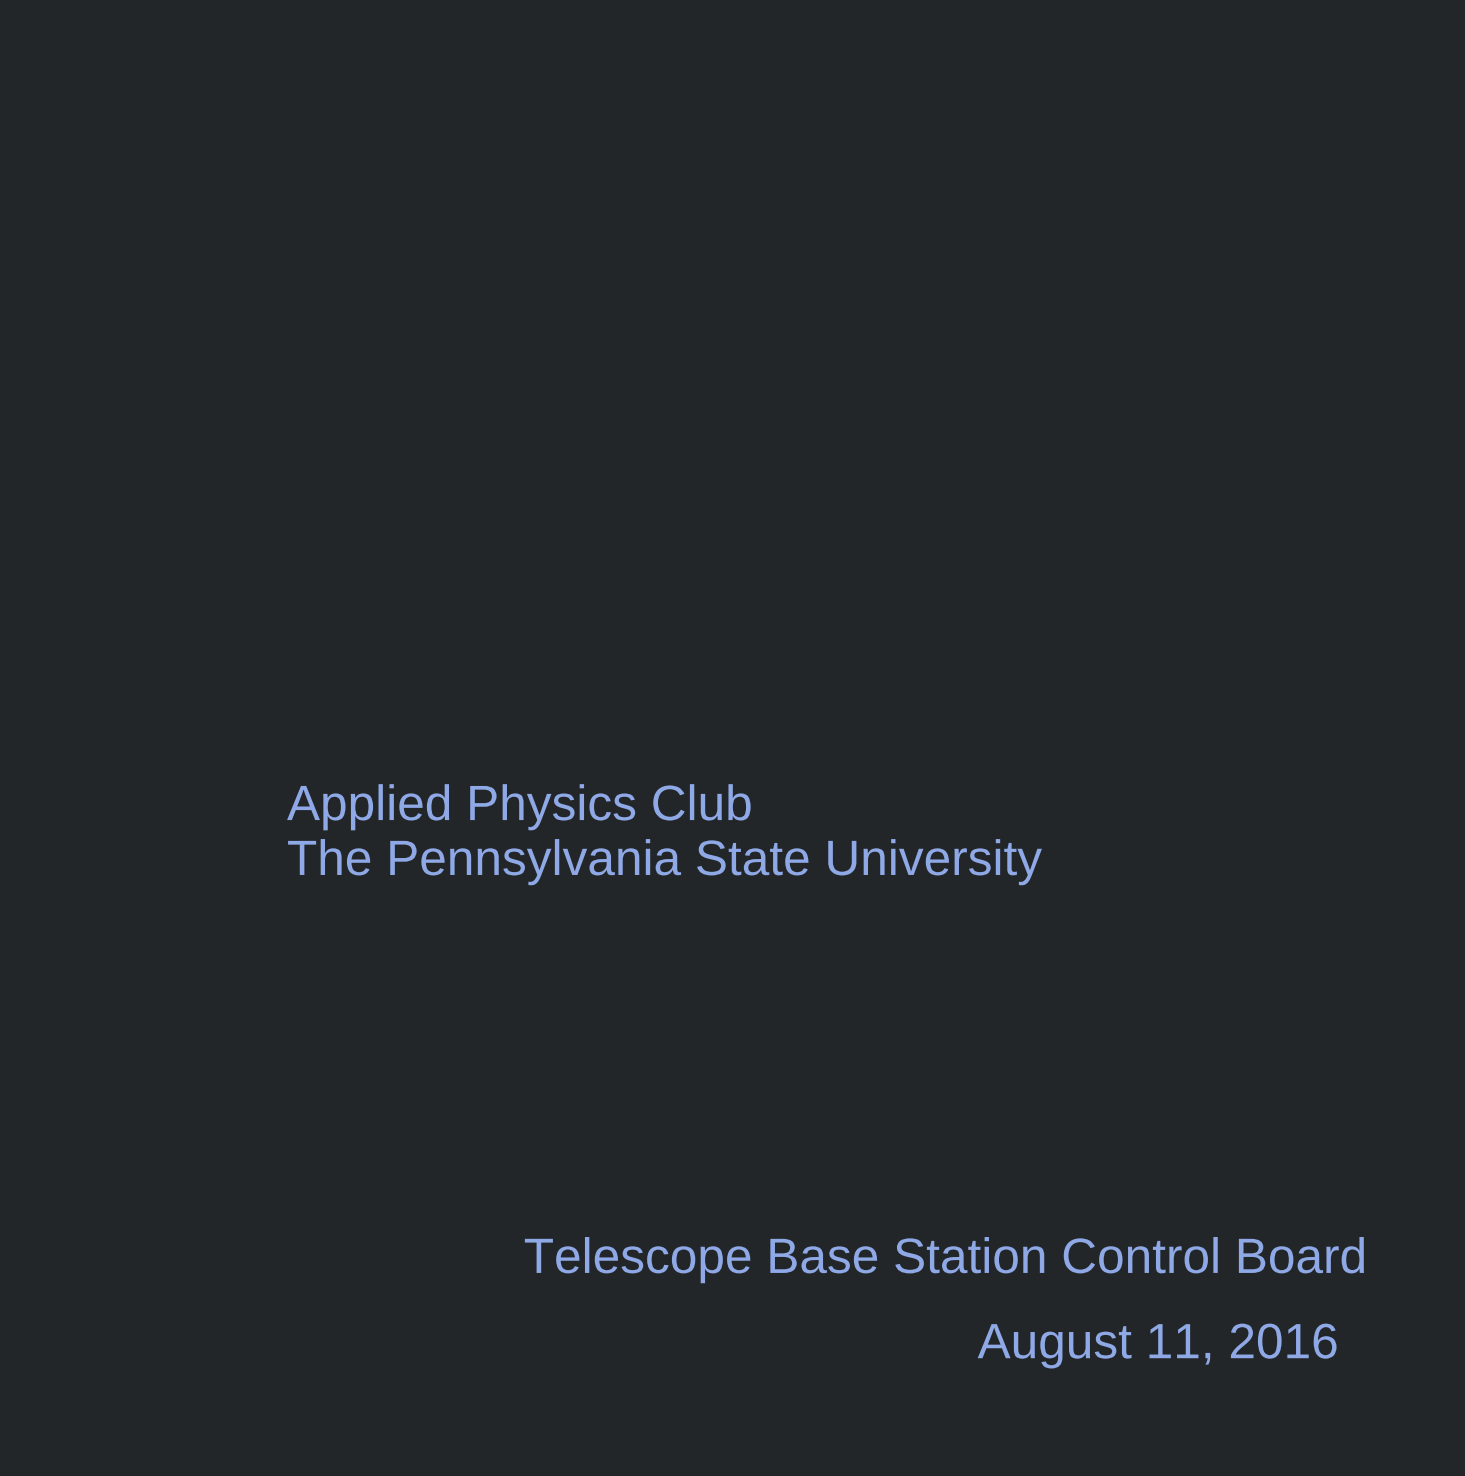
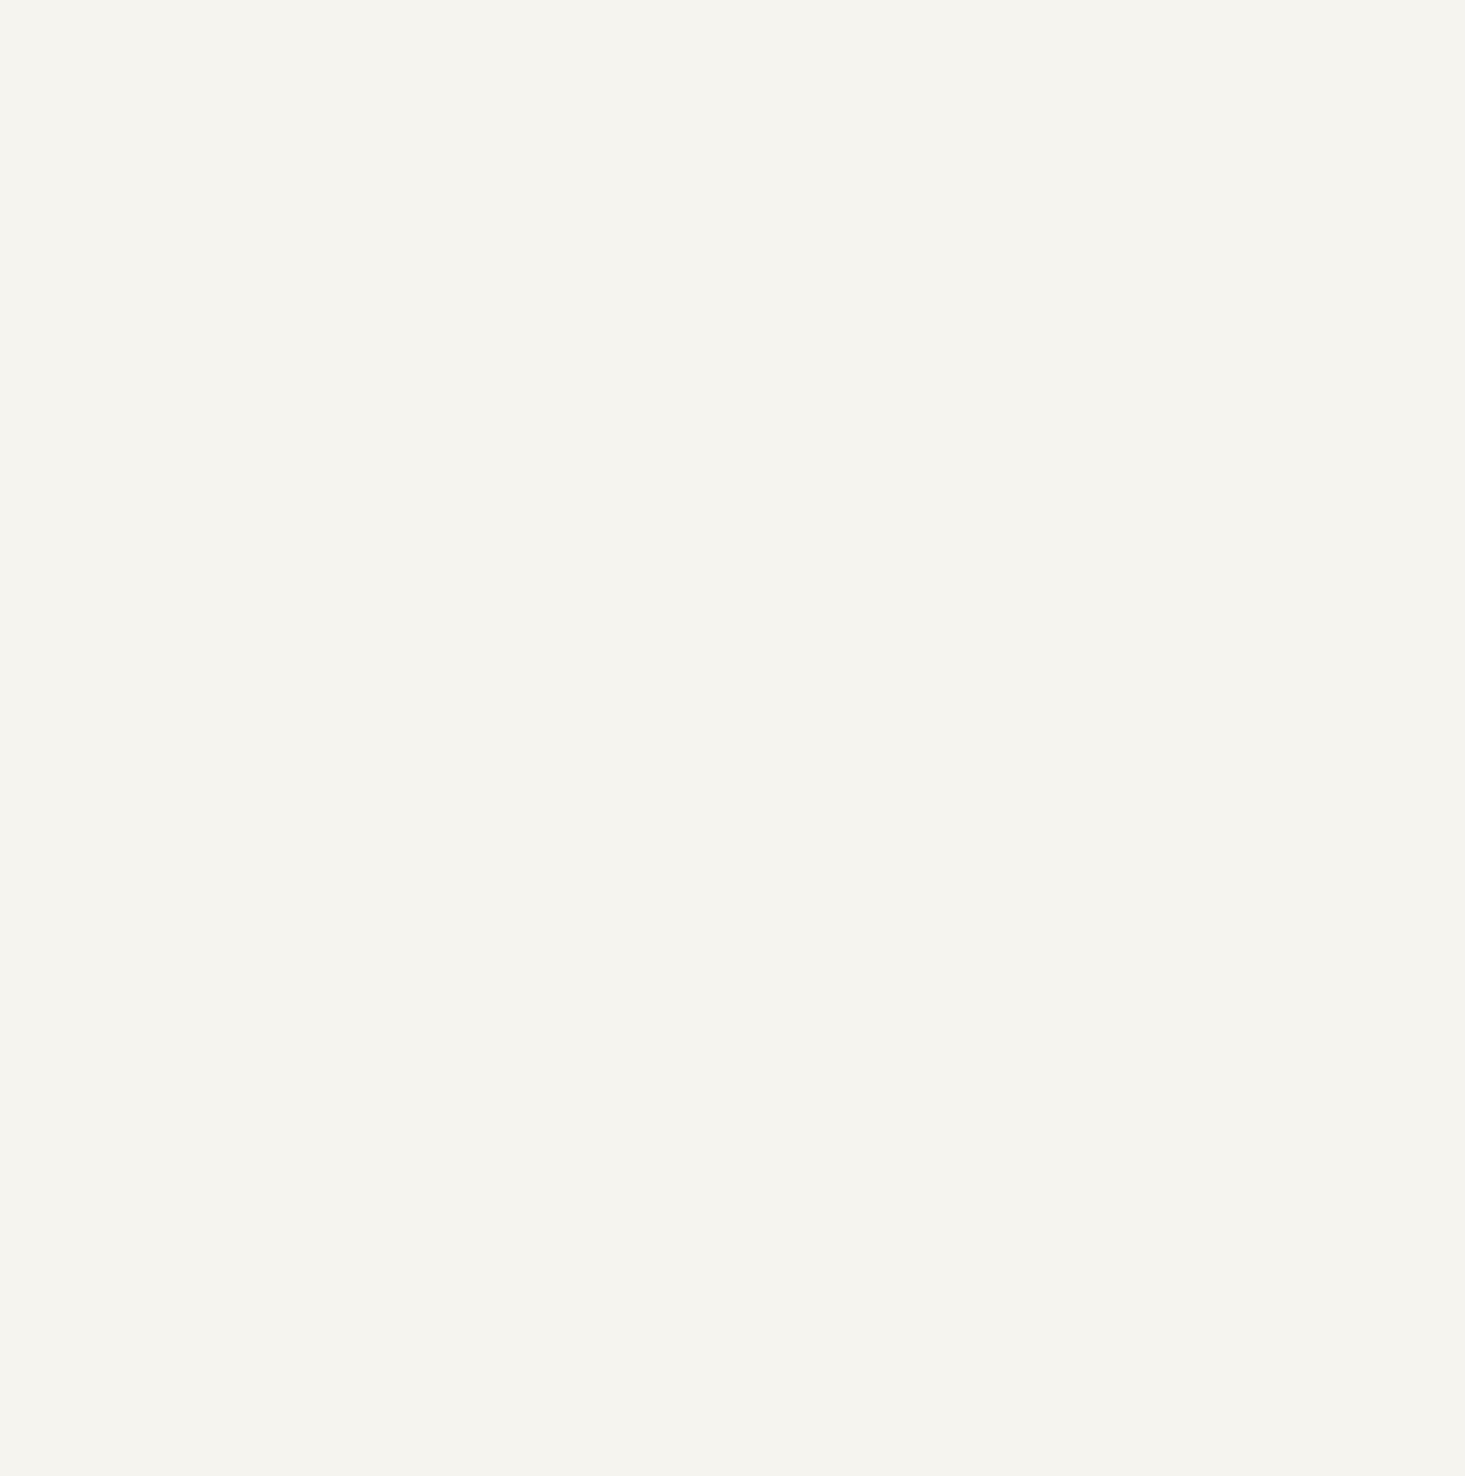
text: Applied Physics Club (518, 807) -> none
text: The Pennsylvania State University (665, 862) -> none
text: Telescope Base Station Control Board (944, 1260) -> none
text: August 11, 2016 (1157, 1346) -> none

